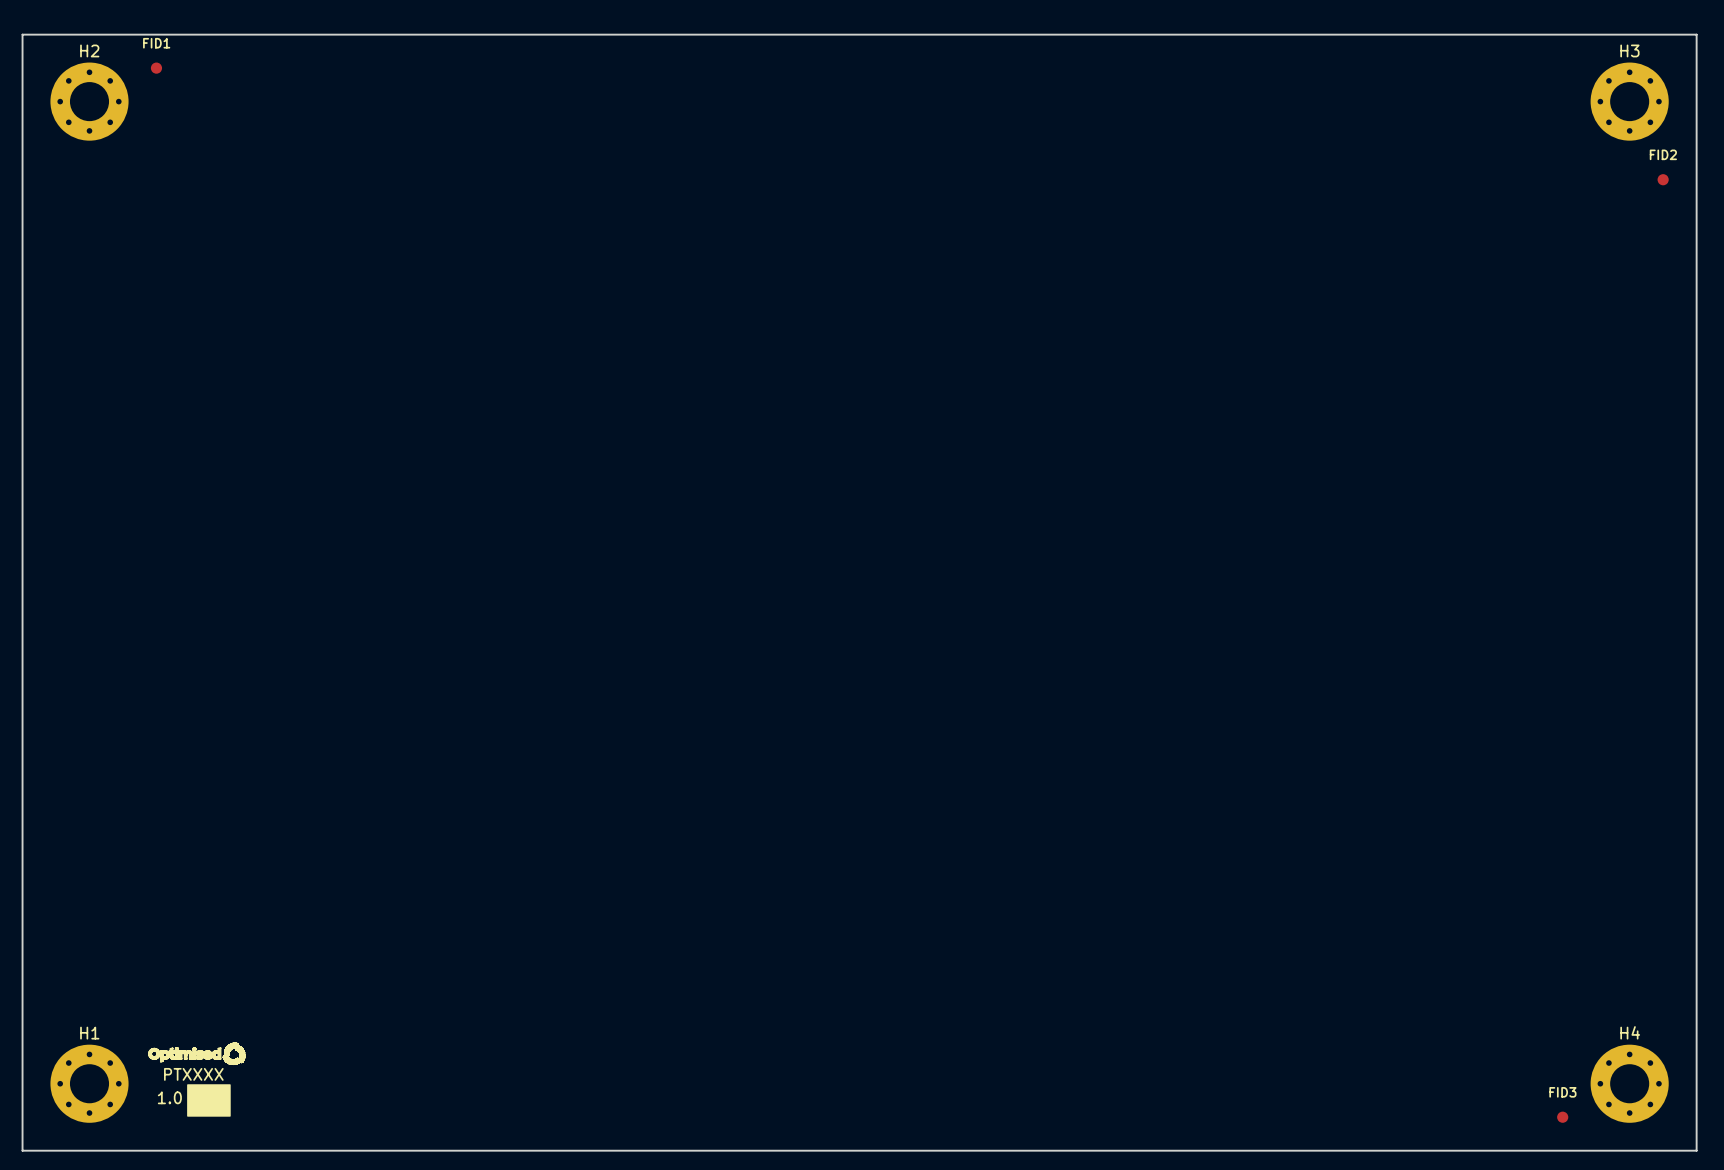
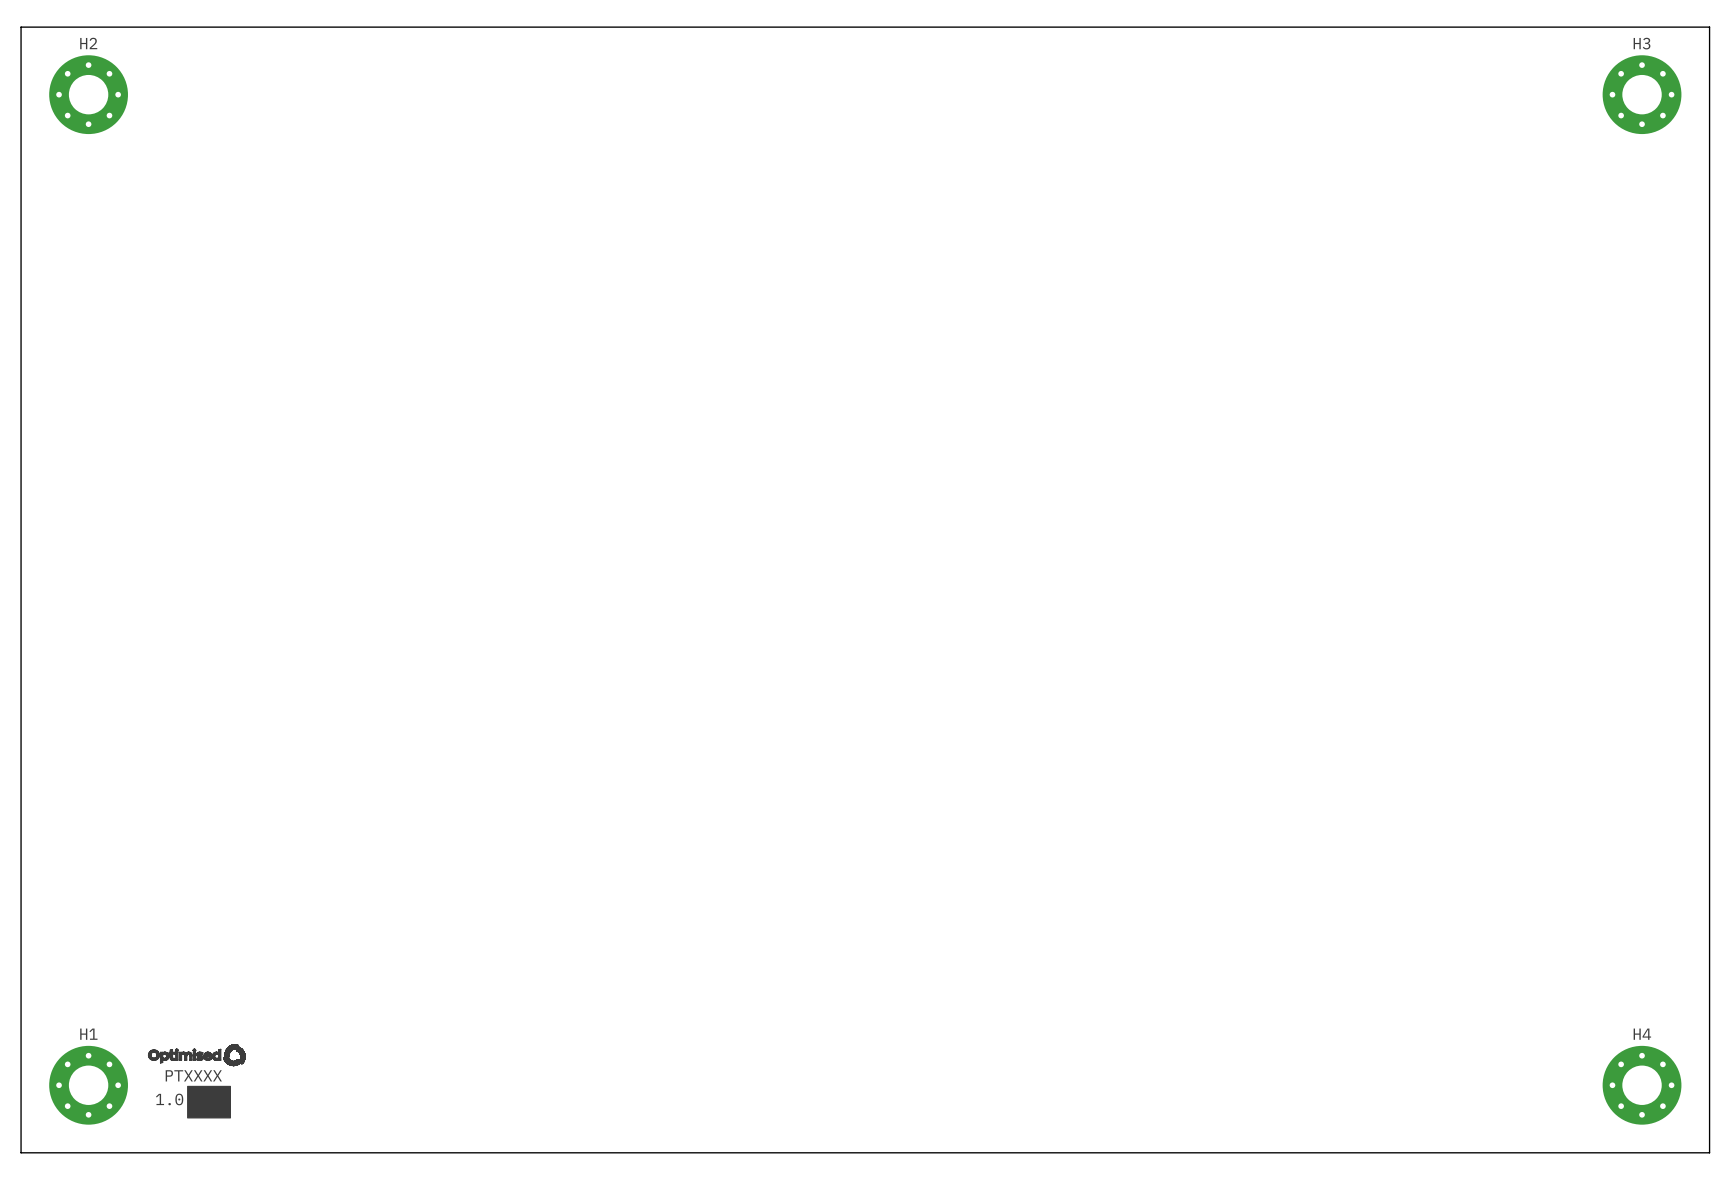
FID1: (156, 68) -> none
FID2: (1663, 179) -> none
FID3: (1562, 1117) -> none

